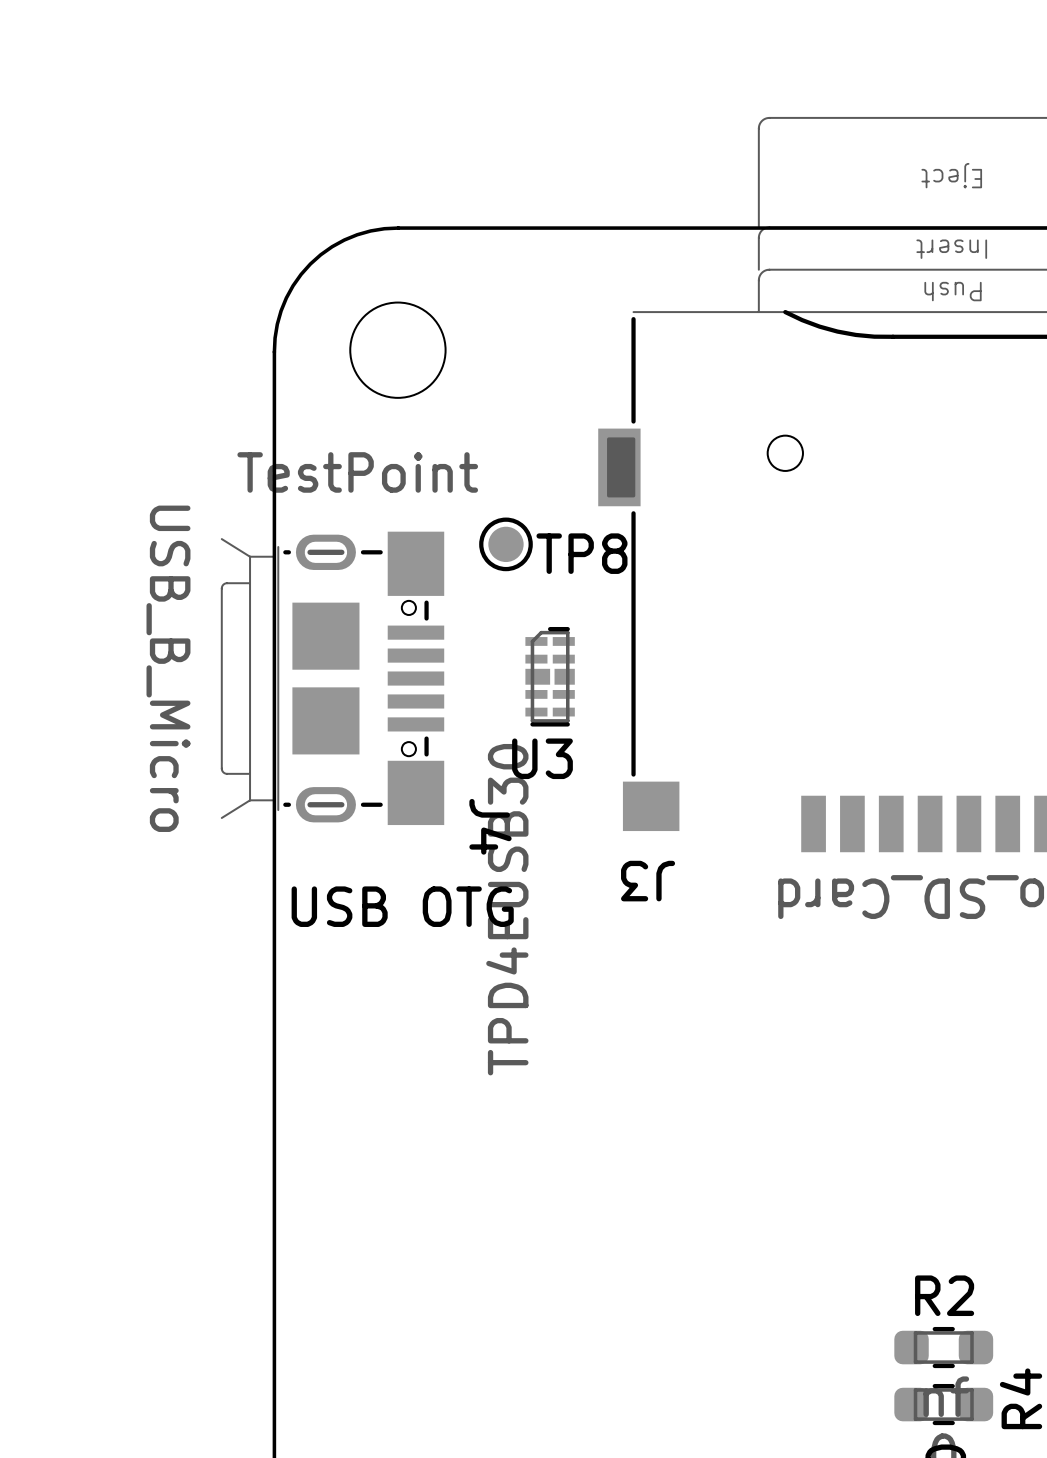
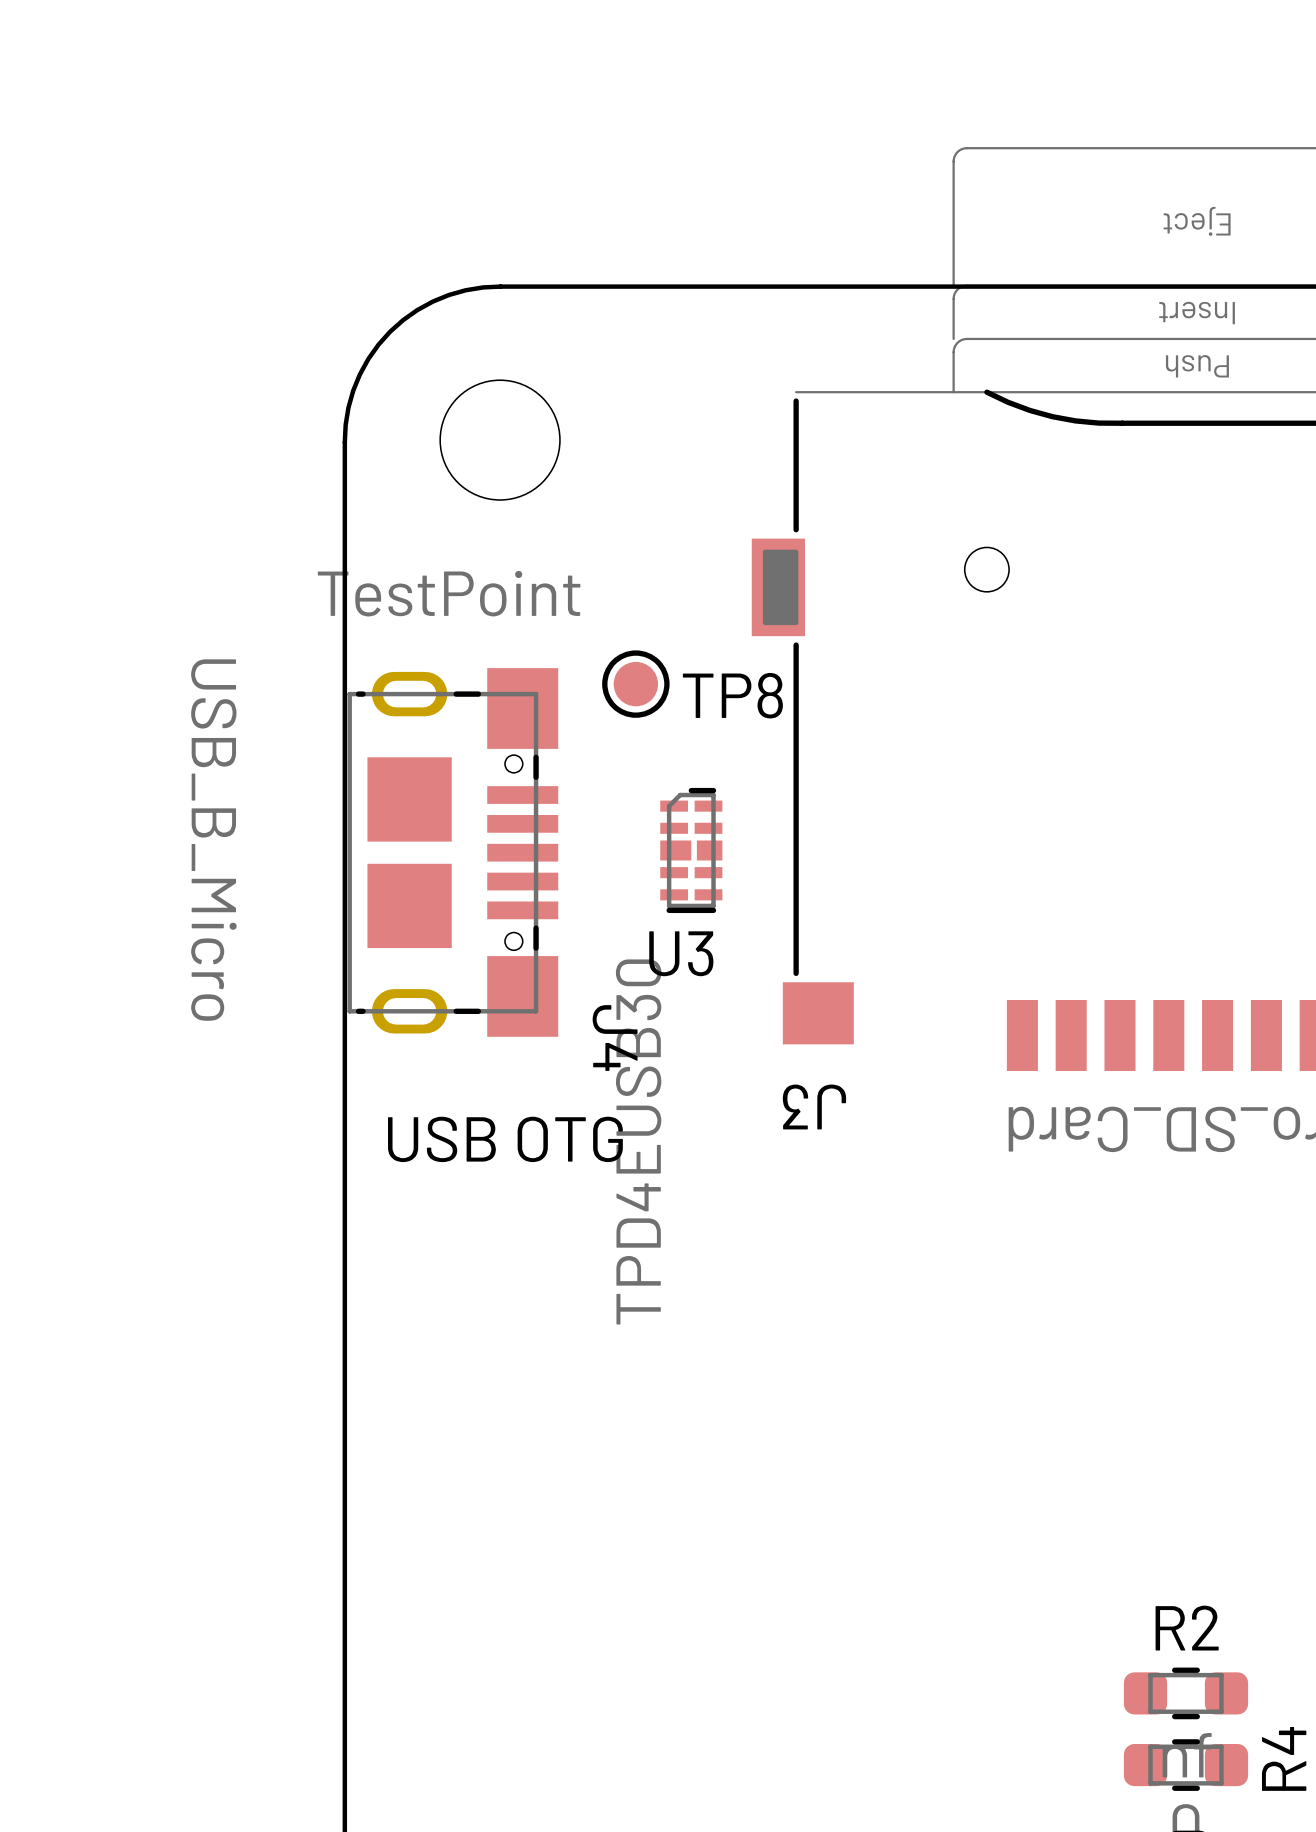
J4 footprint: [221, 531, 445, 826] -> [347, 668, 559, 1037]

